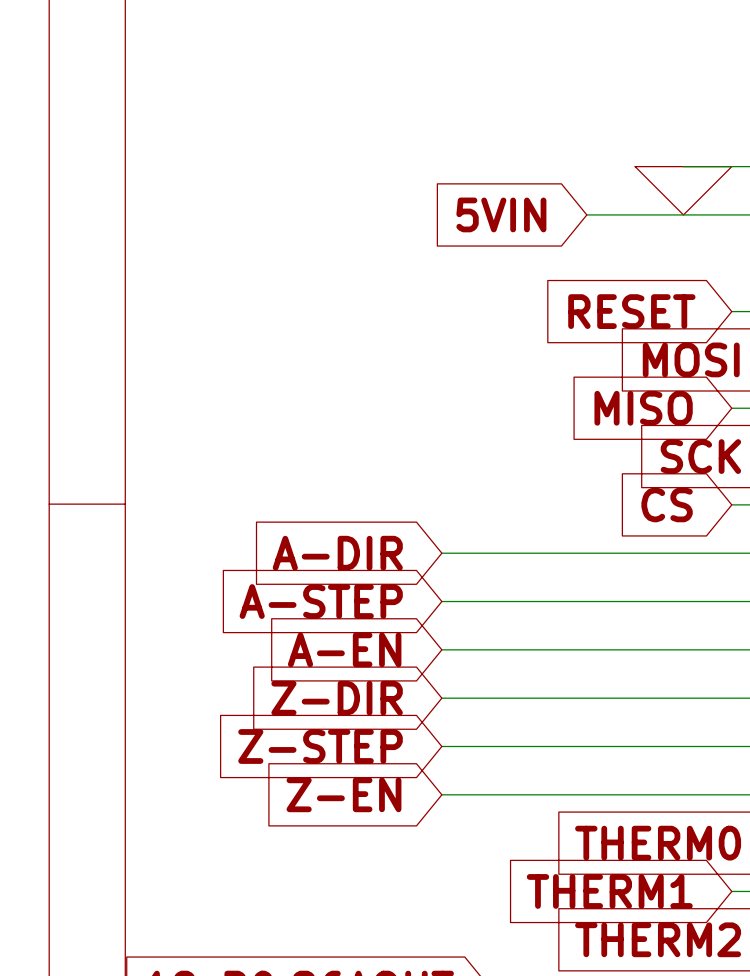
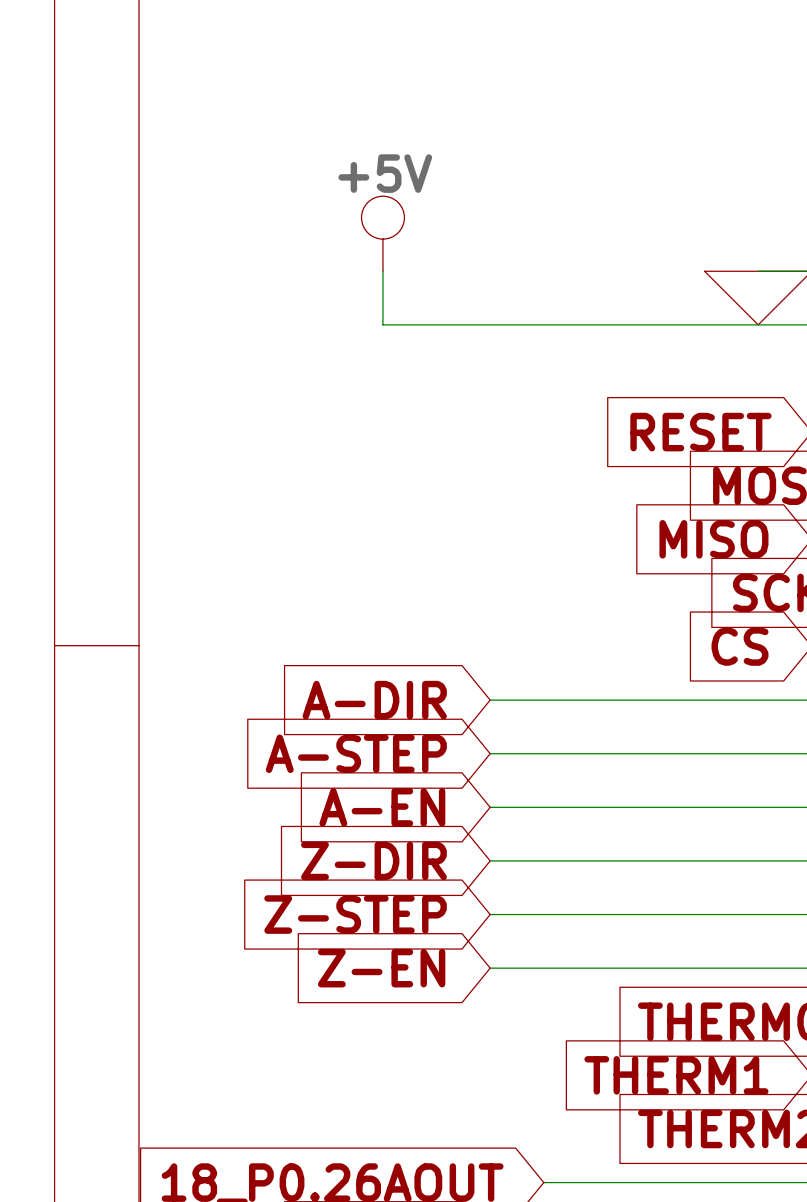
power symbol: none -> +5V (382, 233)
wire: none -> (382, 271) (382, 324) (651, 324)
global label: 5VIN (501, 214) -> none

